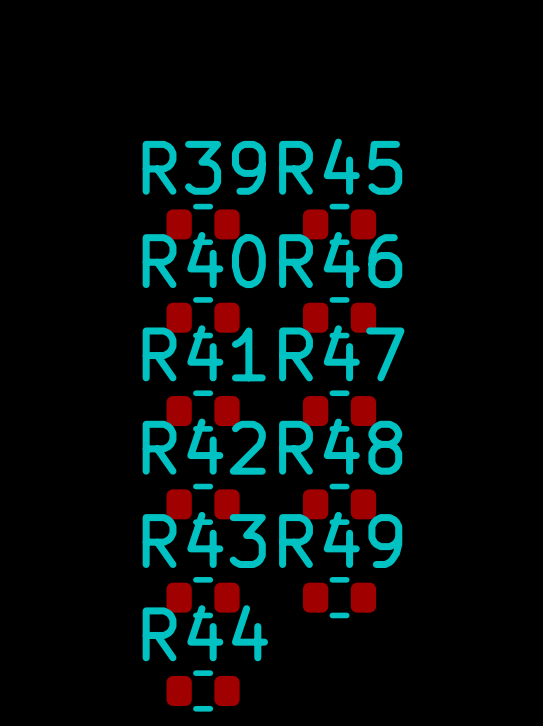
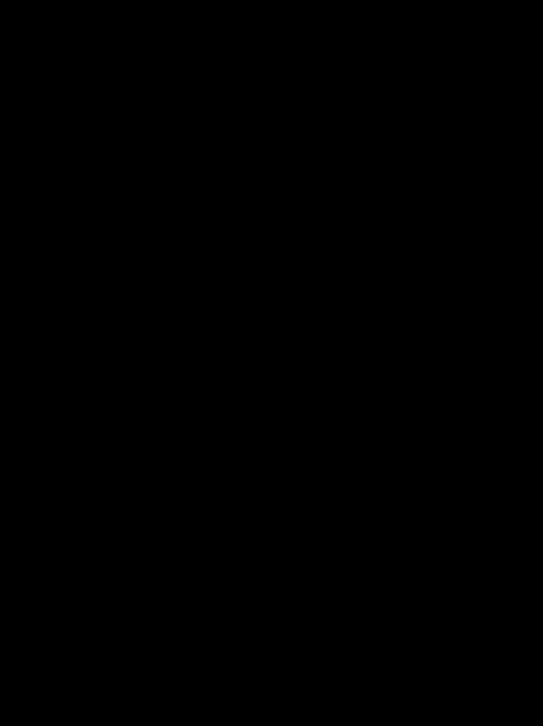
R39: (203, 224) -> none
R45: (339, 224) -> none
R40: (203, 317) -> none
R46: (339, 317) -> none
R41: (203, 411) -> none
R47: (339, 411) -> none
R42: (203, 504) -> none
R48: (339, 504) -> none
R43: (203, 597) -> none
R49: (339, 597) -> none
R44: (203, 690) -> none

